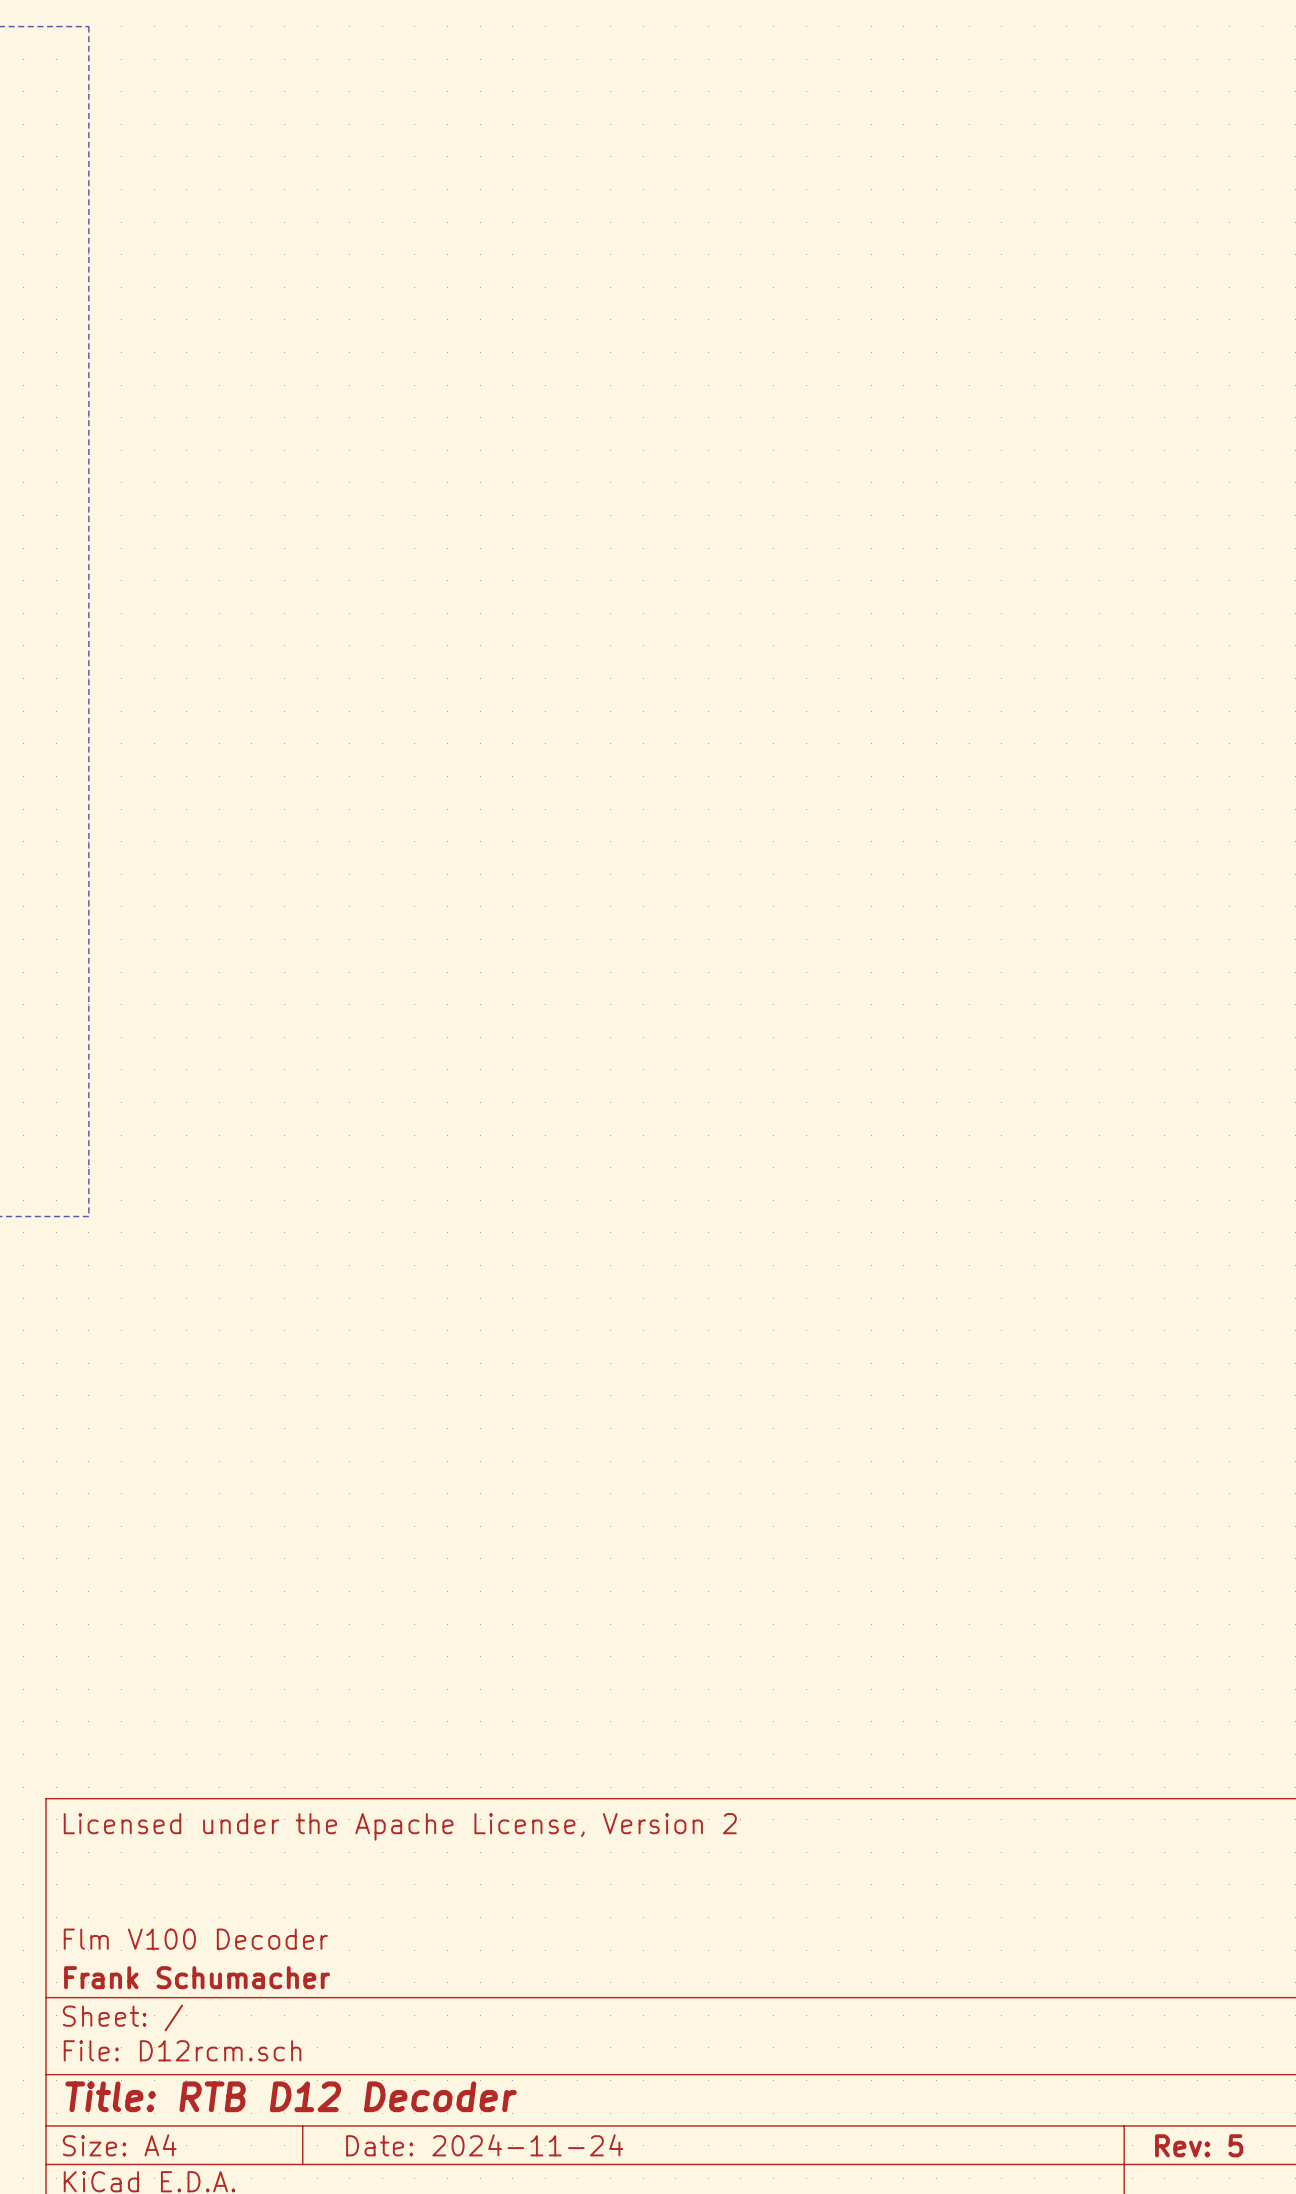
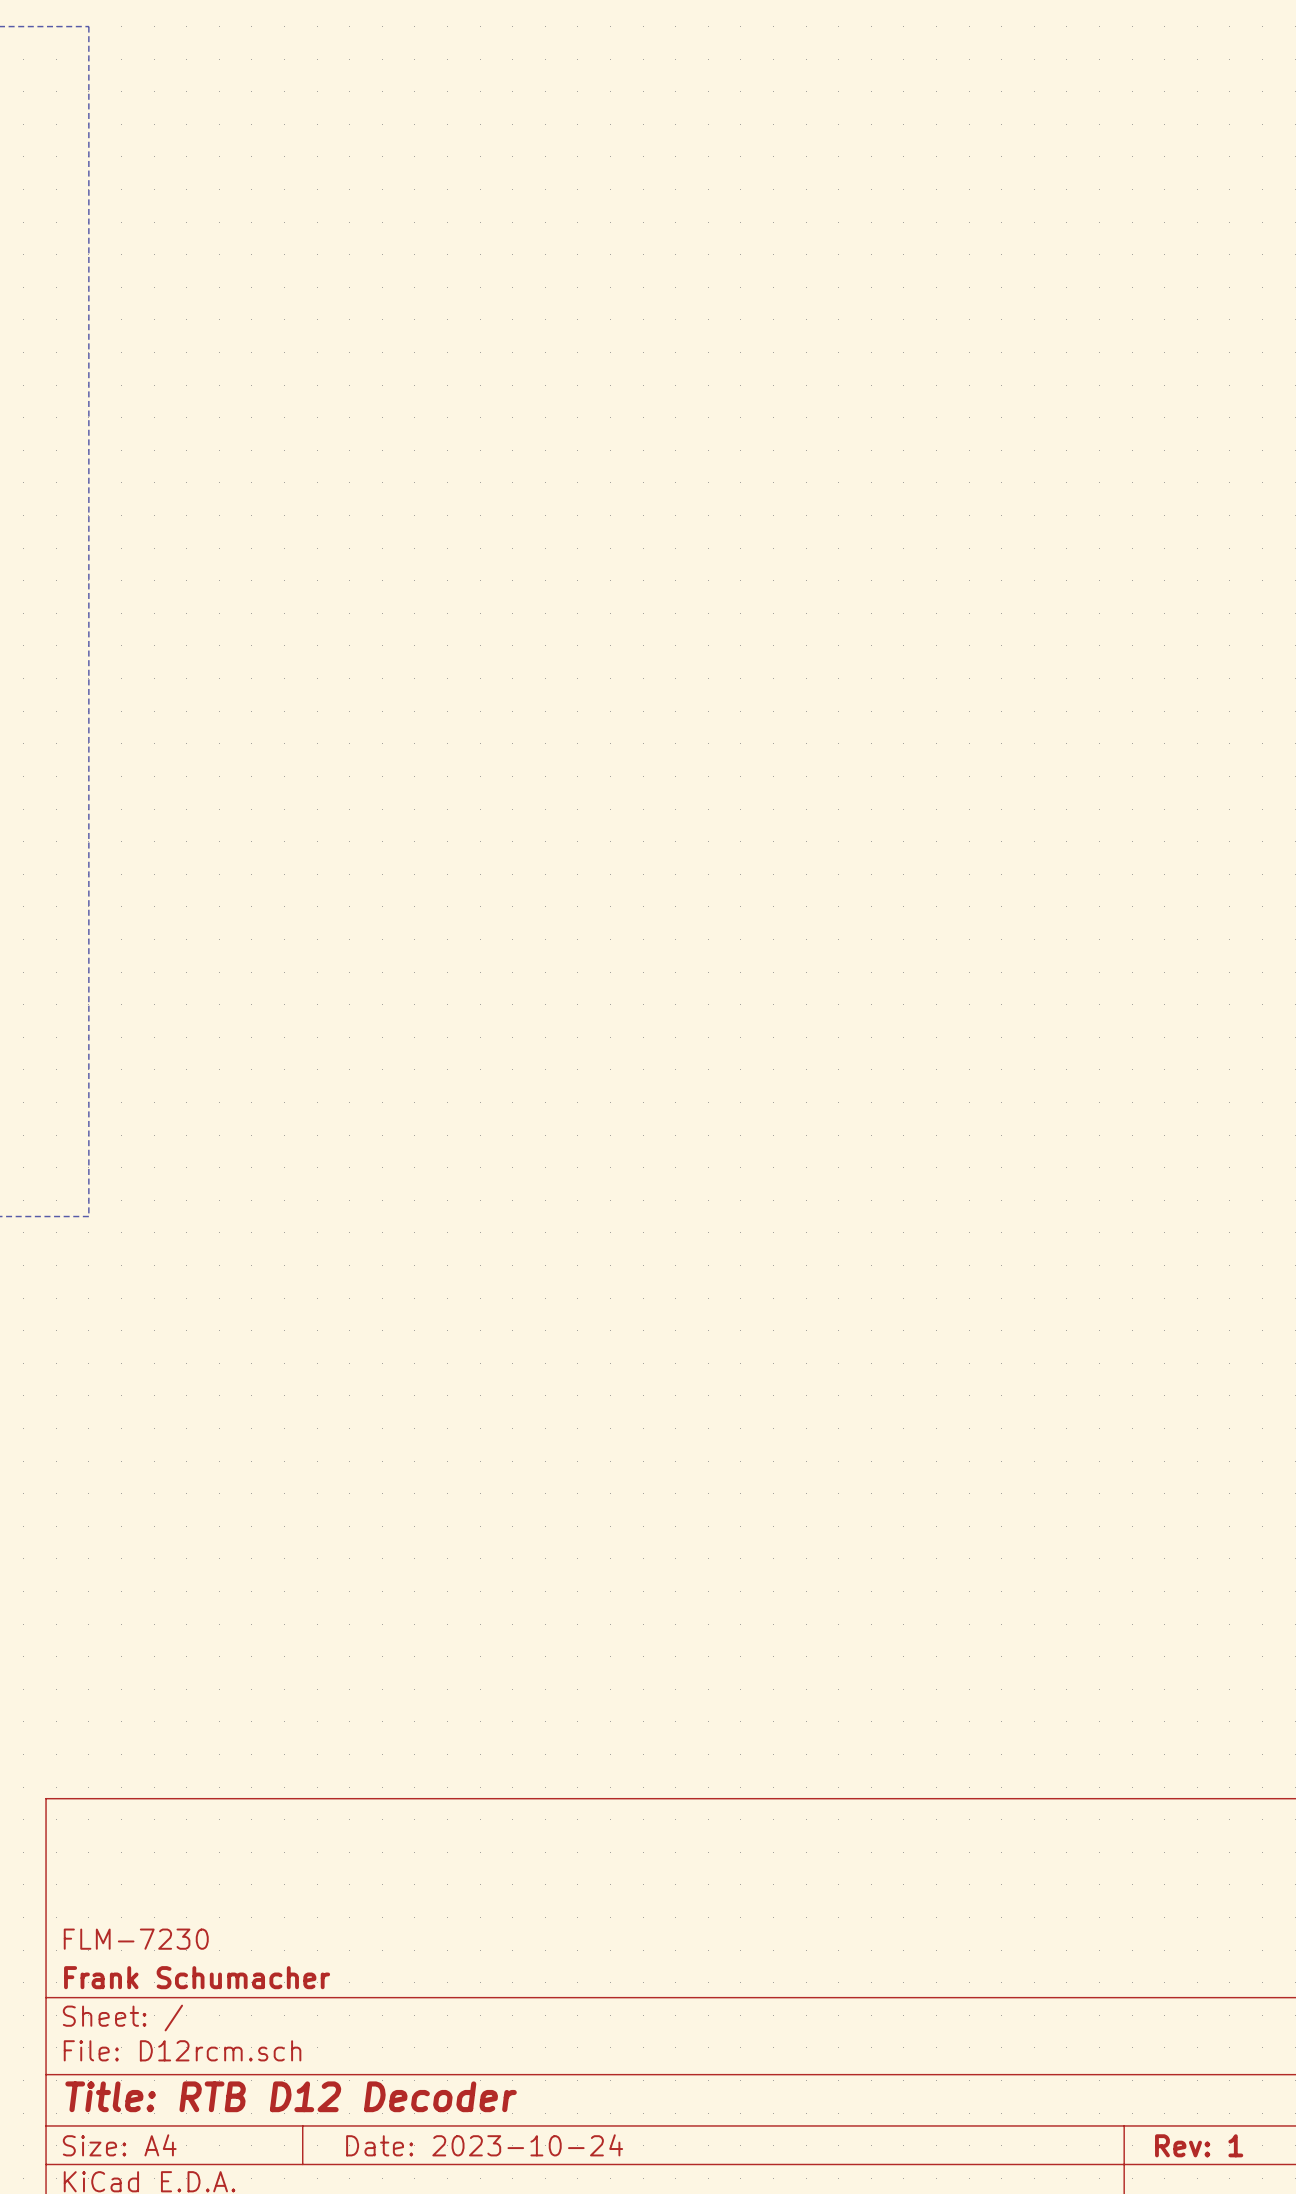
title block: Licensed under the Apache License, Version 2 (400, 1826) -> none
title block: Flm V100 Decoder (195, 1939) -> FLM-7230 (136, 1939)
title block: Date: 2024-11-24 (484, 2145) -> Date: 2023-10-24 (484, 2145)
title block: Rev: 5 (1199, 2145) -> Rev: 1 (1199, 2145)

